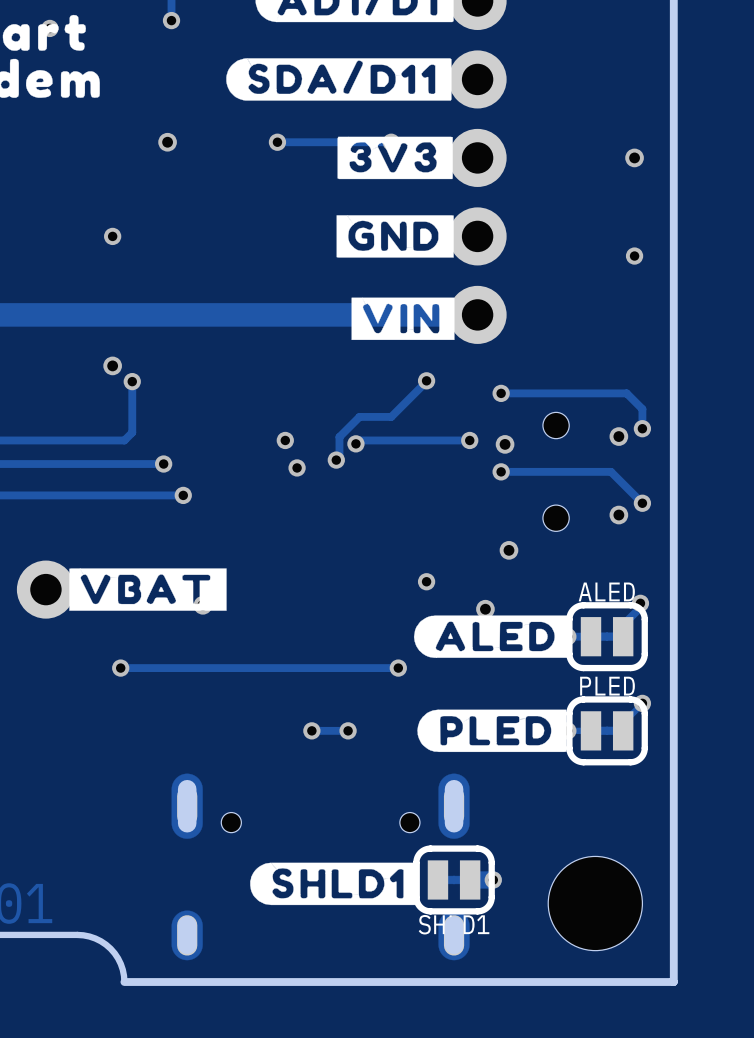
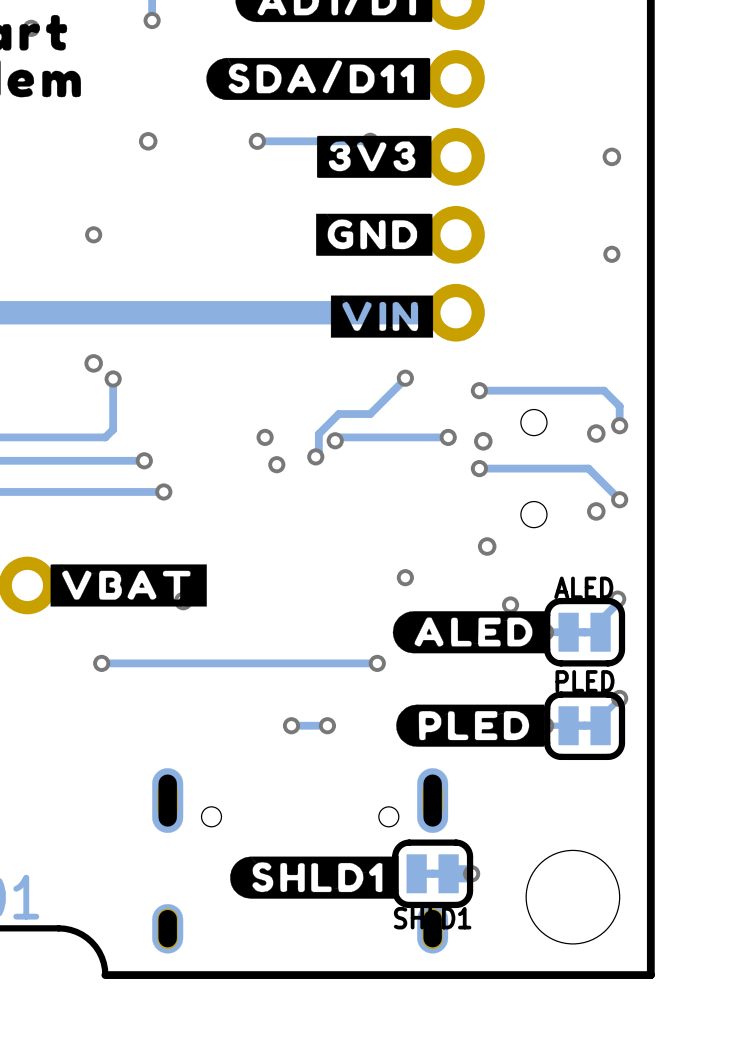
via: (485, 609) -> none
via: none -> (510, 604)

